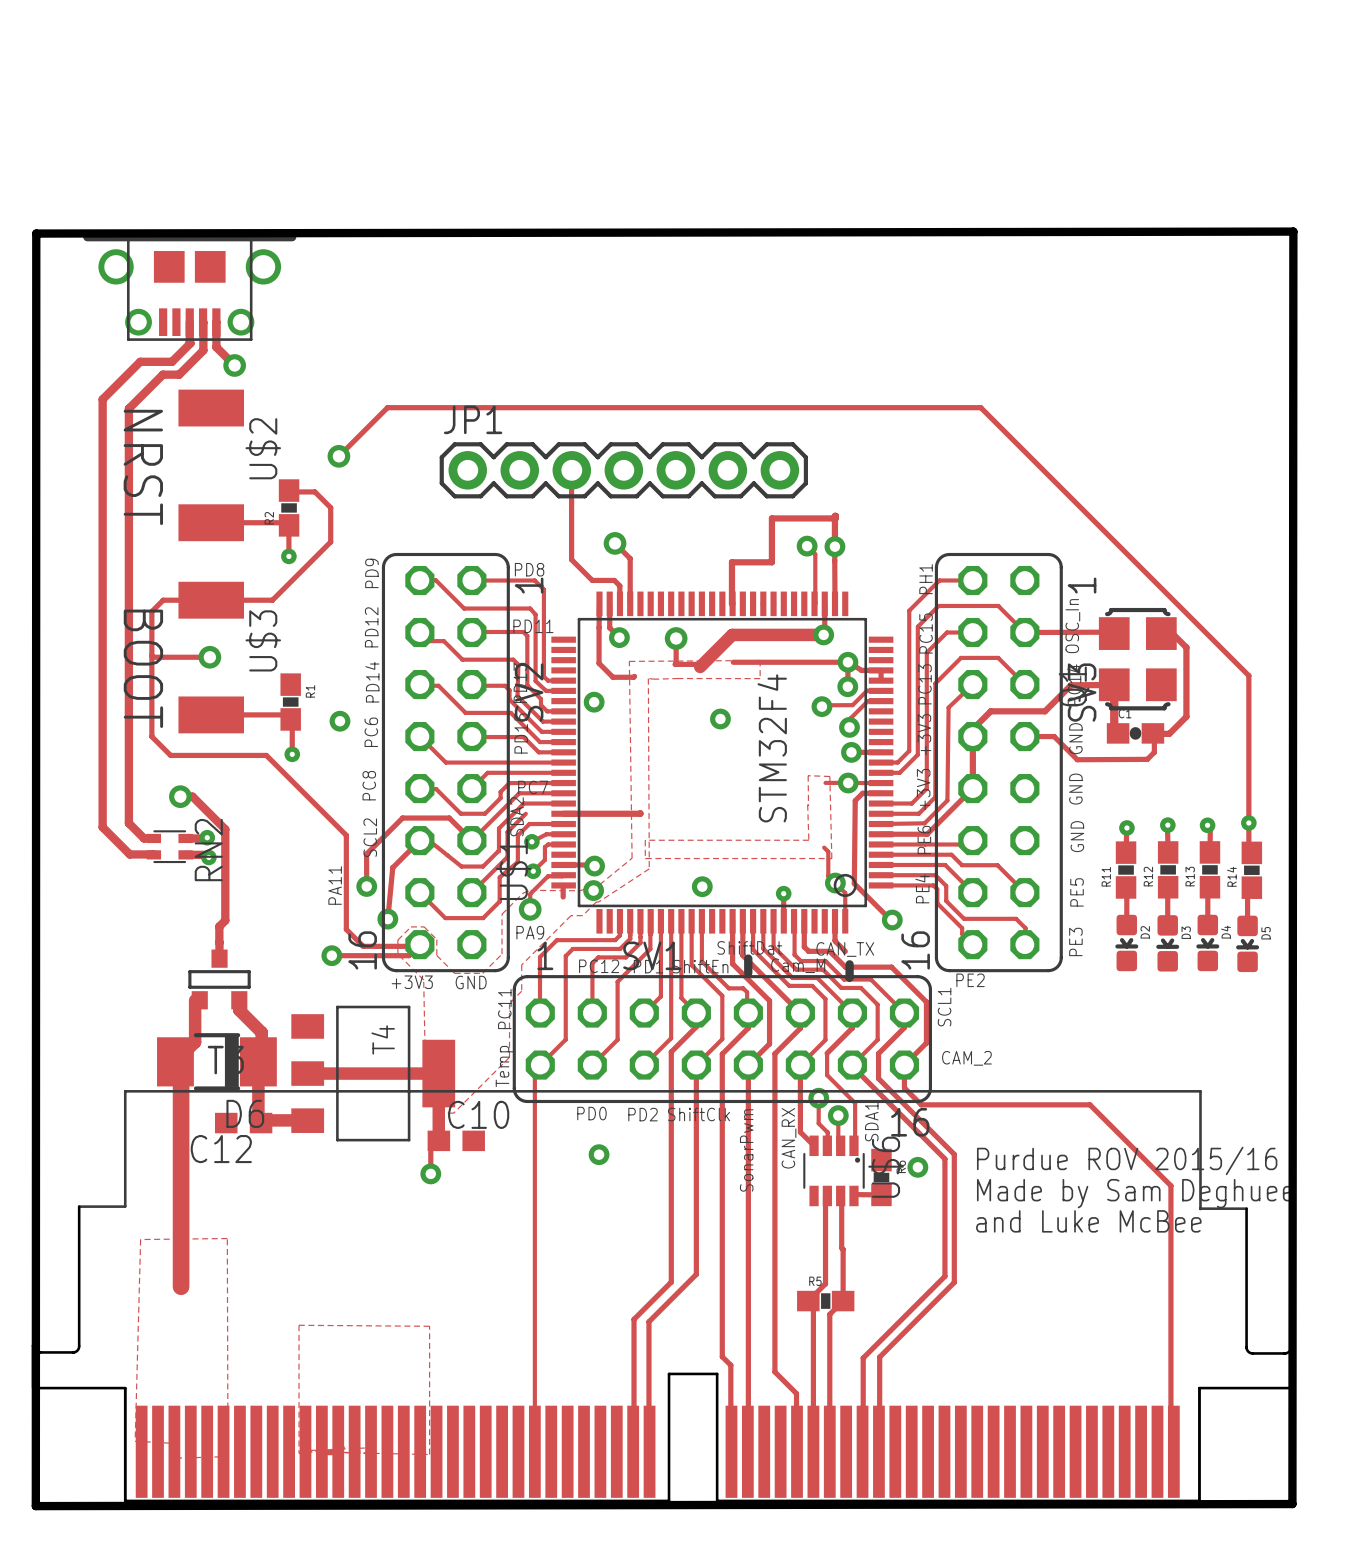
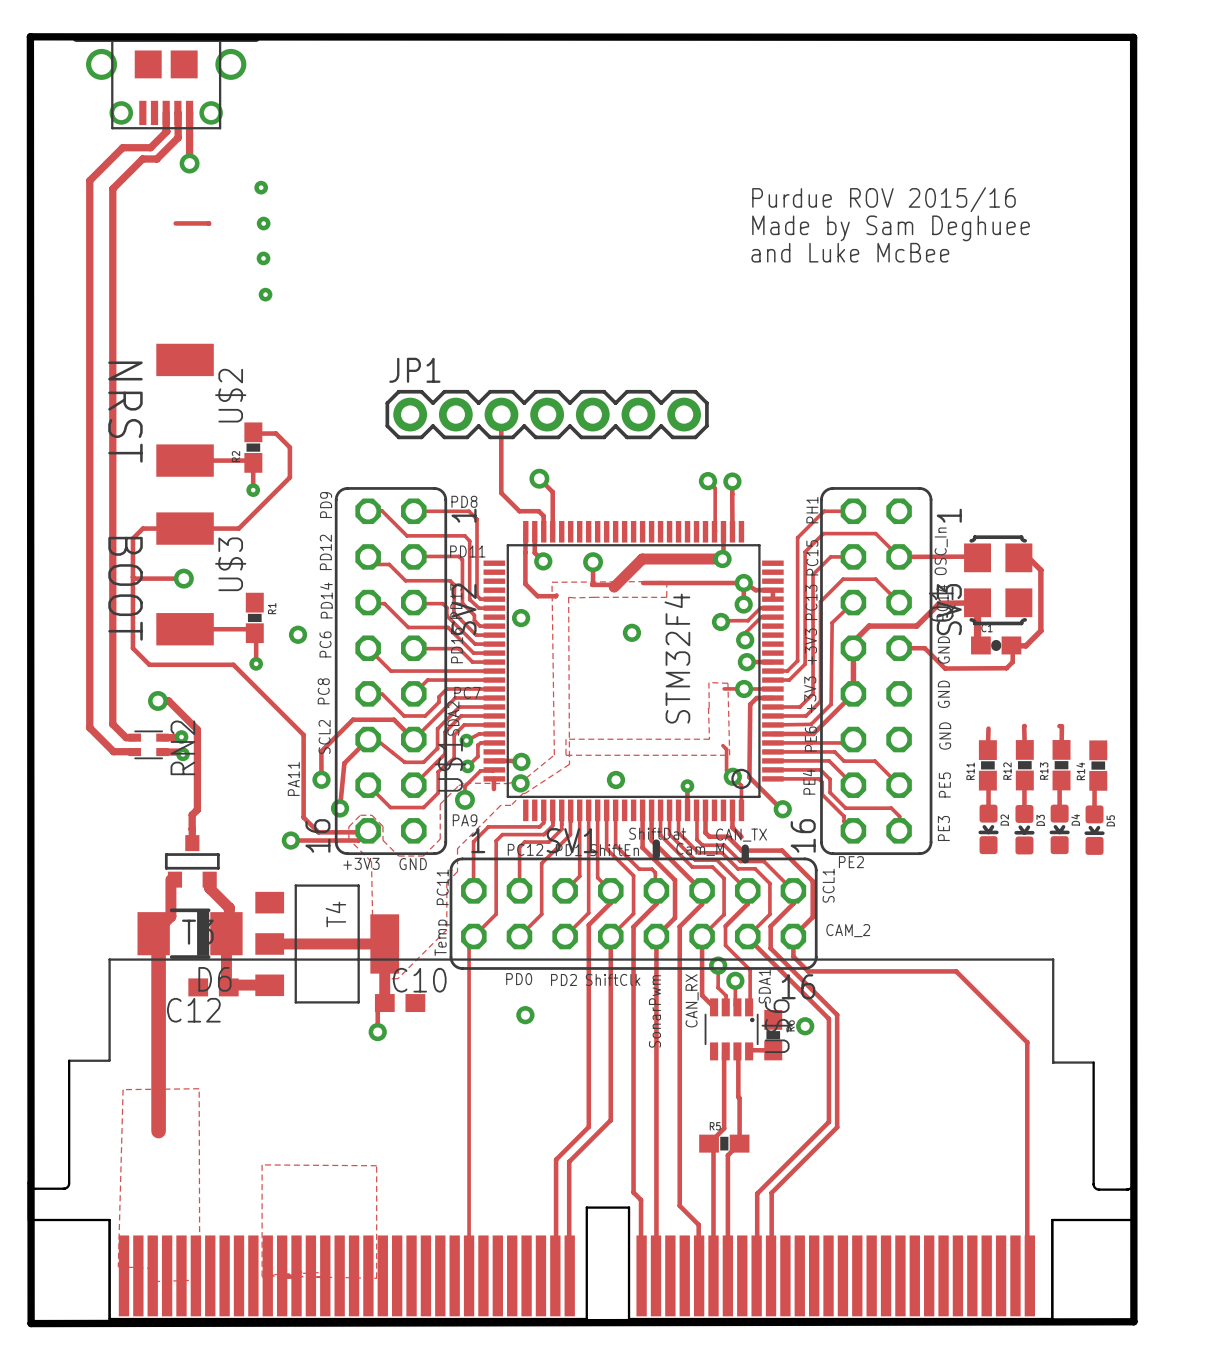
track: none -> (189, 112) (189, 163)
via: none -> (189, 163)
via: none -> (261, 187)
text: none -> Purdue ROV 2015/16 (883, 199)
track: none -> (175, 223) (209, 223)
via: none -> (263, 223)
text: none -> Made by Sam Deghuee (891, 228)
text: none -> and Luke McBee (850, 252)
part position: (189, 286) -> (166, 82)
via: none -> (263, 258)
track: (189, 322) (190, 343) (171, 361) (140, 361) (102, 399) -> (166, 112) (166, 131) (150, 147) (122, 147) (89, 180) (89, 352)
track: (203, 322) (203, 350) (179, 374) (162, 374) (128, 408) -> (177, 112) (178, 137) (156, 159) (142, 159) (112, 188) (112, 360)
track: (216, 322) (216, 347) (234, 365) -> none
via: none -> (265, 294)
via: (234, 365) -> none
track: (338, 456) (387, 407) (980, 407) (1248, 675) (1248, 851) (1251, 852) -> none
via: (338, 456) -> none
track: (834, 546) (834, 515) (835, 515) (835, 518) (771, 518) (771, 562) (731, 562) (732, 603) -> none
track: (640, 813) (563, 813) -> (461, 715) (494, 715)
via: (1248, 822) -> none
via: (1167, 825) -> none
via: (1207, 825) -> none
via: (1126, 827) -> none
text: Purdue ROV 2015/16 (1127, 1160) -> none
text: Made by Sam Deghuee (1135, 1193) -> none
text: and Luke McBee (1088, 1221) -> none
board edge: (1292, 1504) (1293, 231) (36, 233) (35, 1506) -> (1133, 1321) (1133, 37) (30, 36) (31, 1323)

